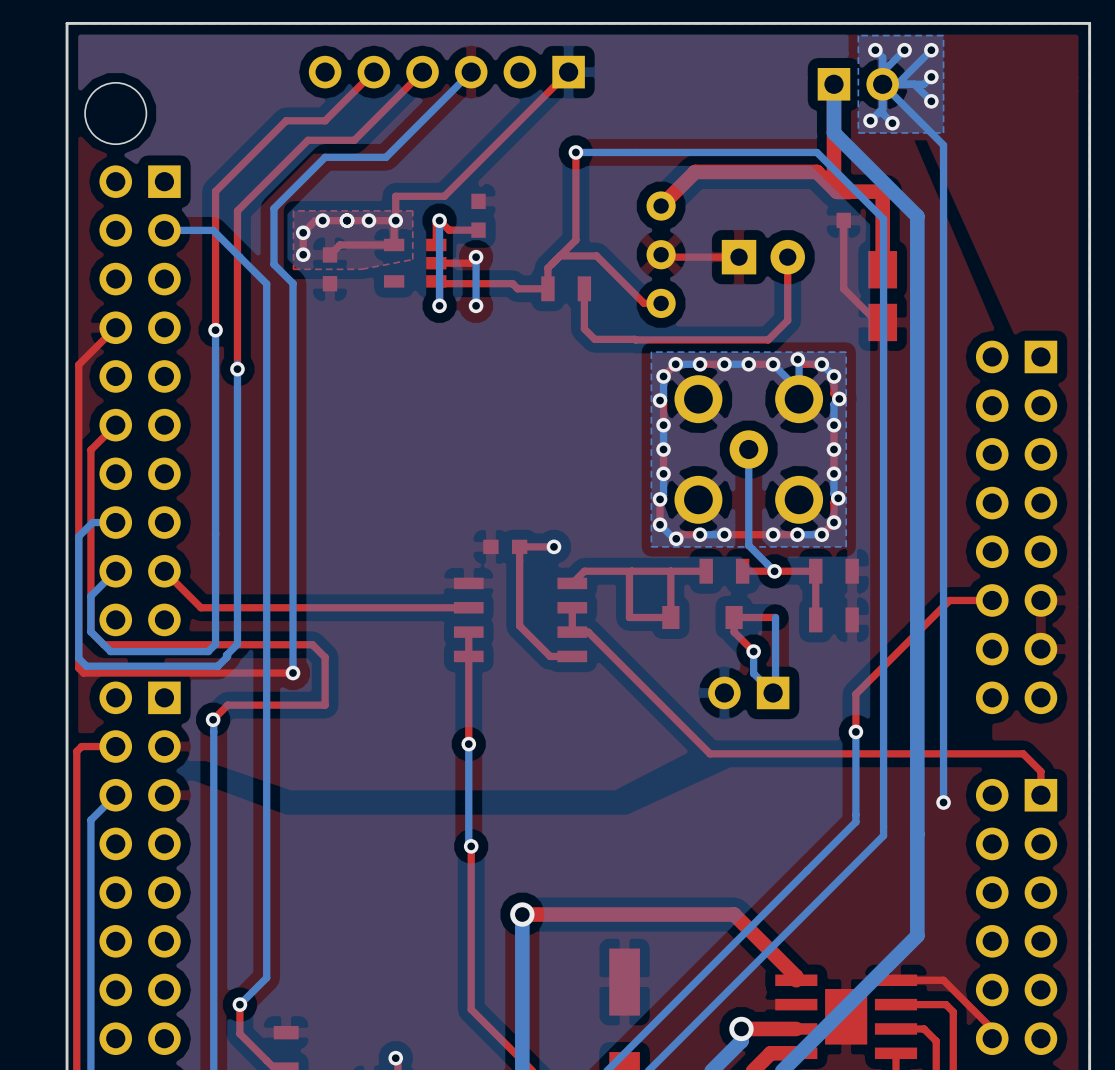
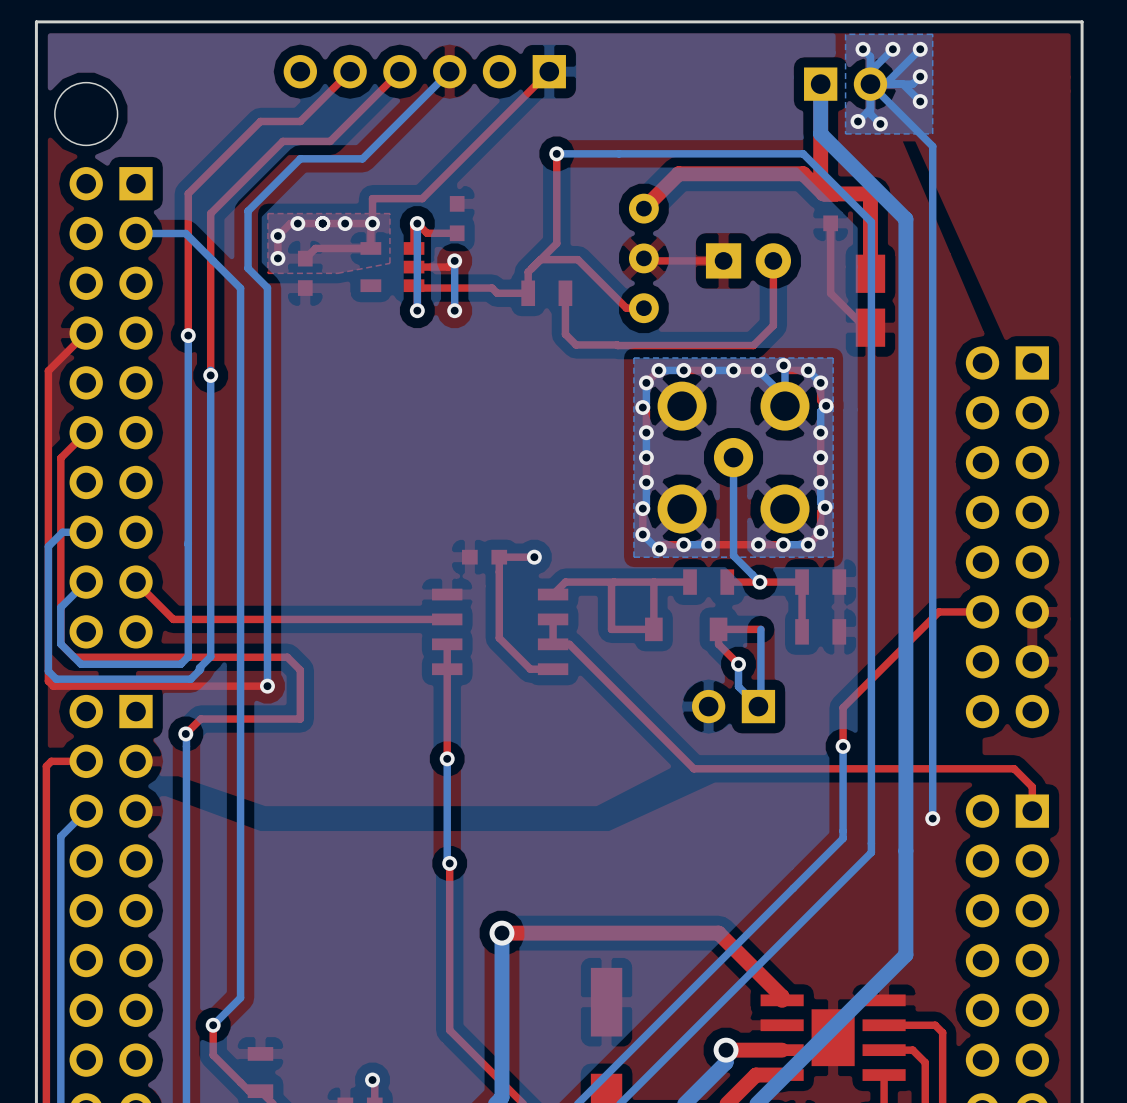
top track: (896, 980) (943, 980) (992, 1028) (992, 1038) -> none

